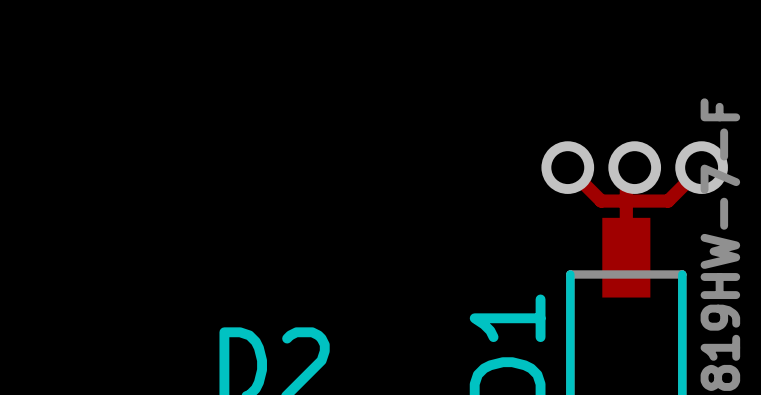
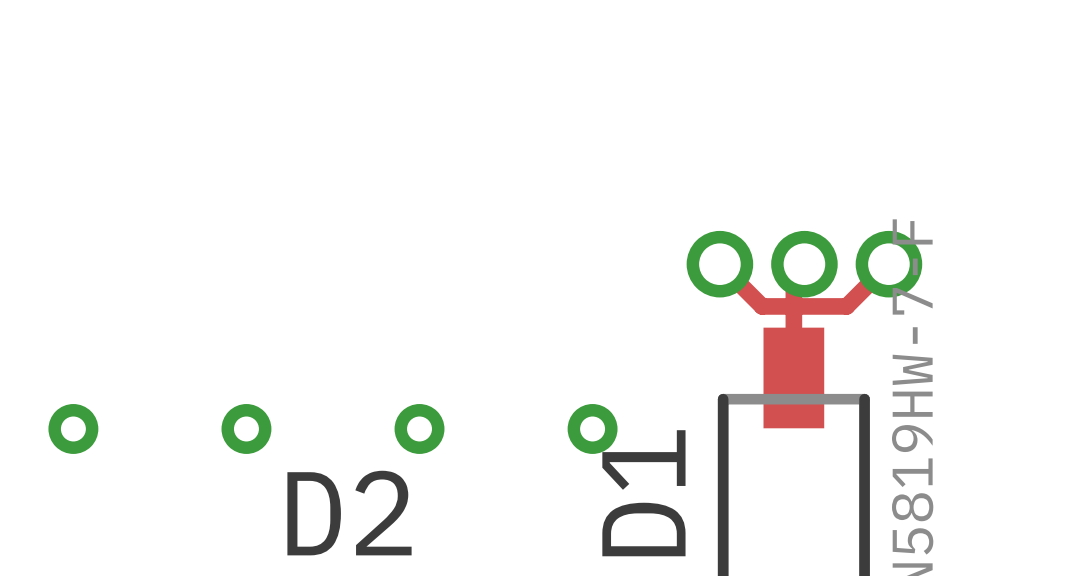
via: none -> (73, 428)
via: none -> (246, 428)
via: none -> (419, 428)
via: none -> (592, 428)

